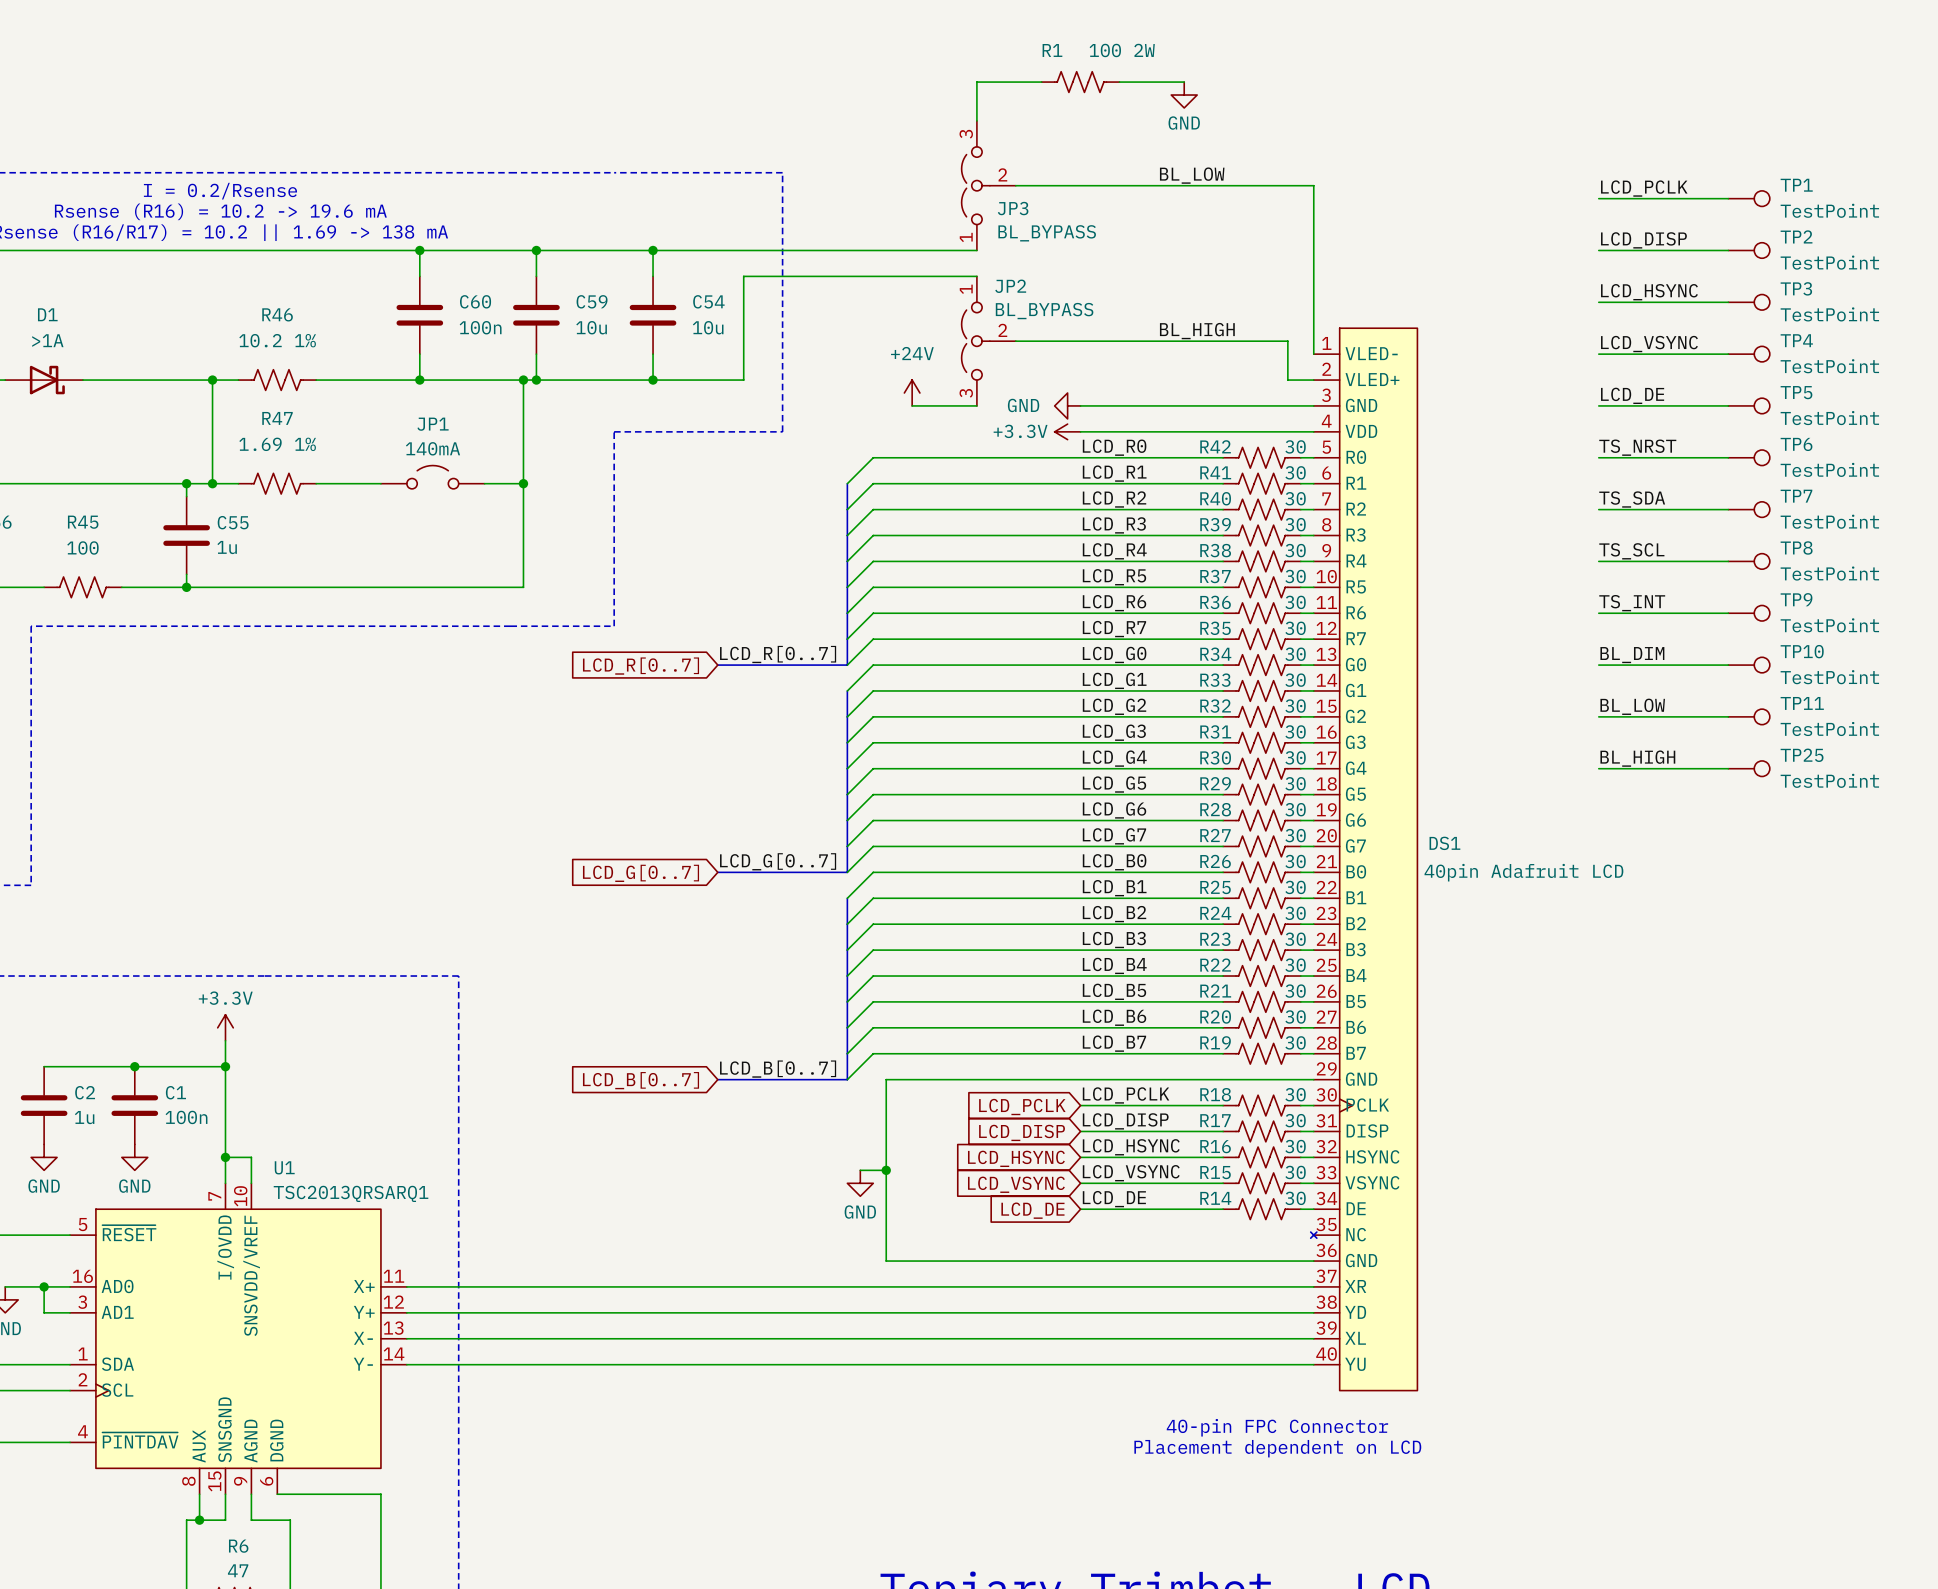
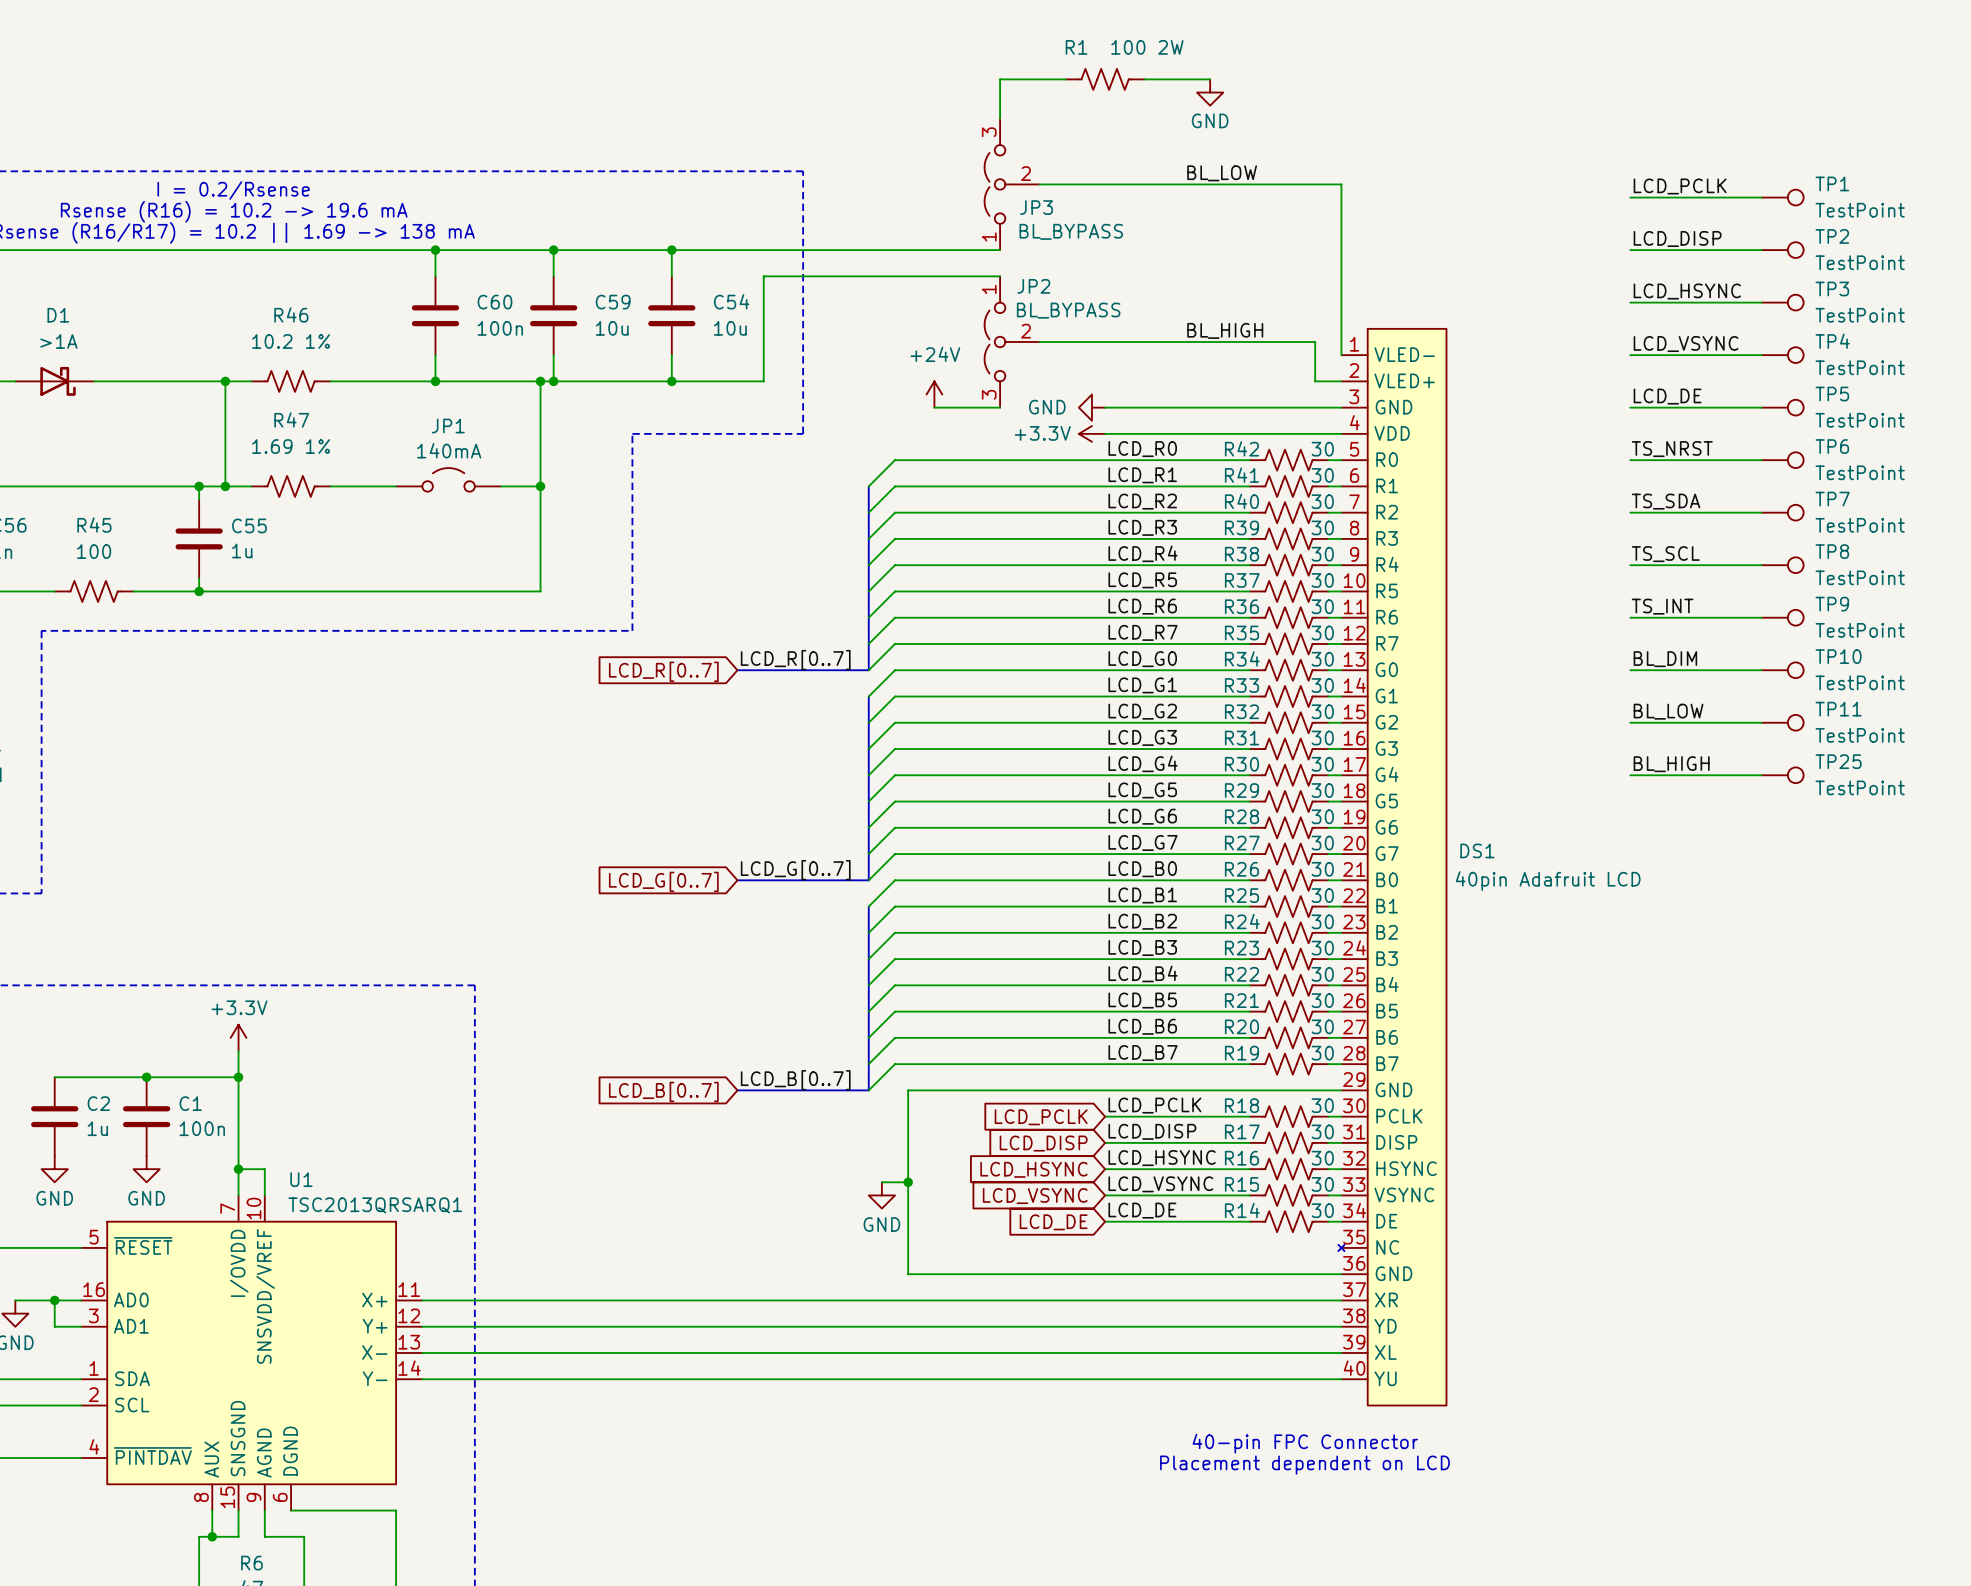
DS1 symbol: [1310, 328, 1418, 1391] -> [1338, 328, 1447, 1406]
U1 symbol: [70, 1183, 407, 1495] -> [80, 1195, 423, 1511]

